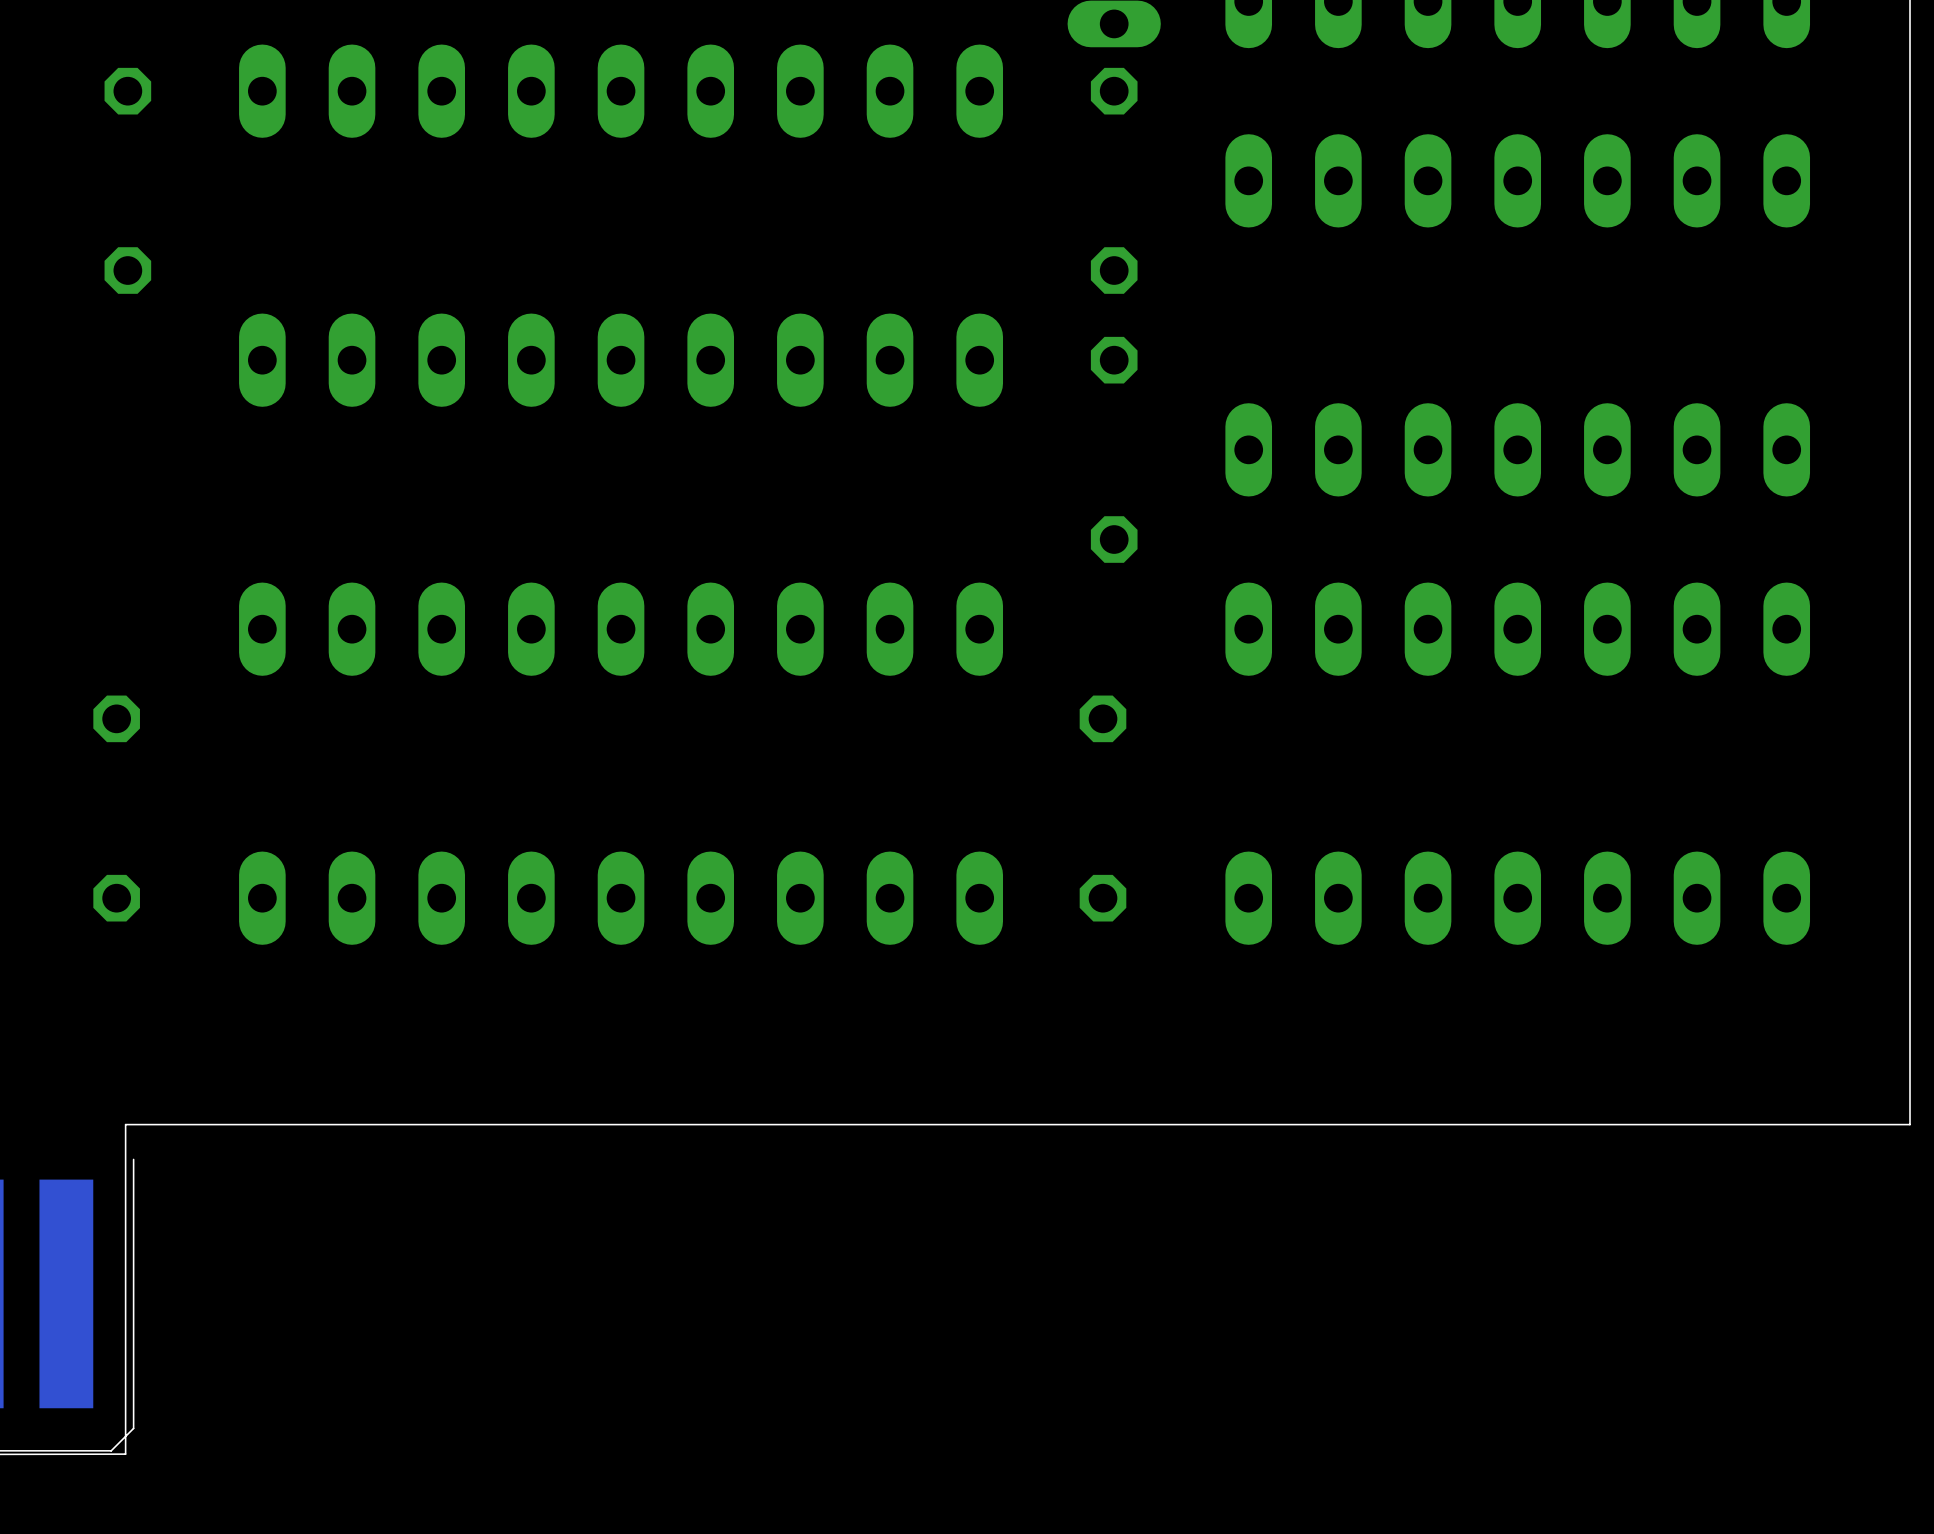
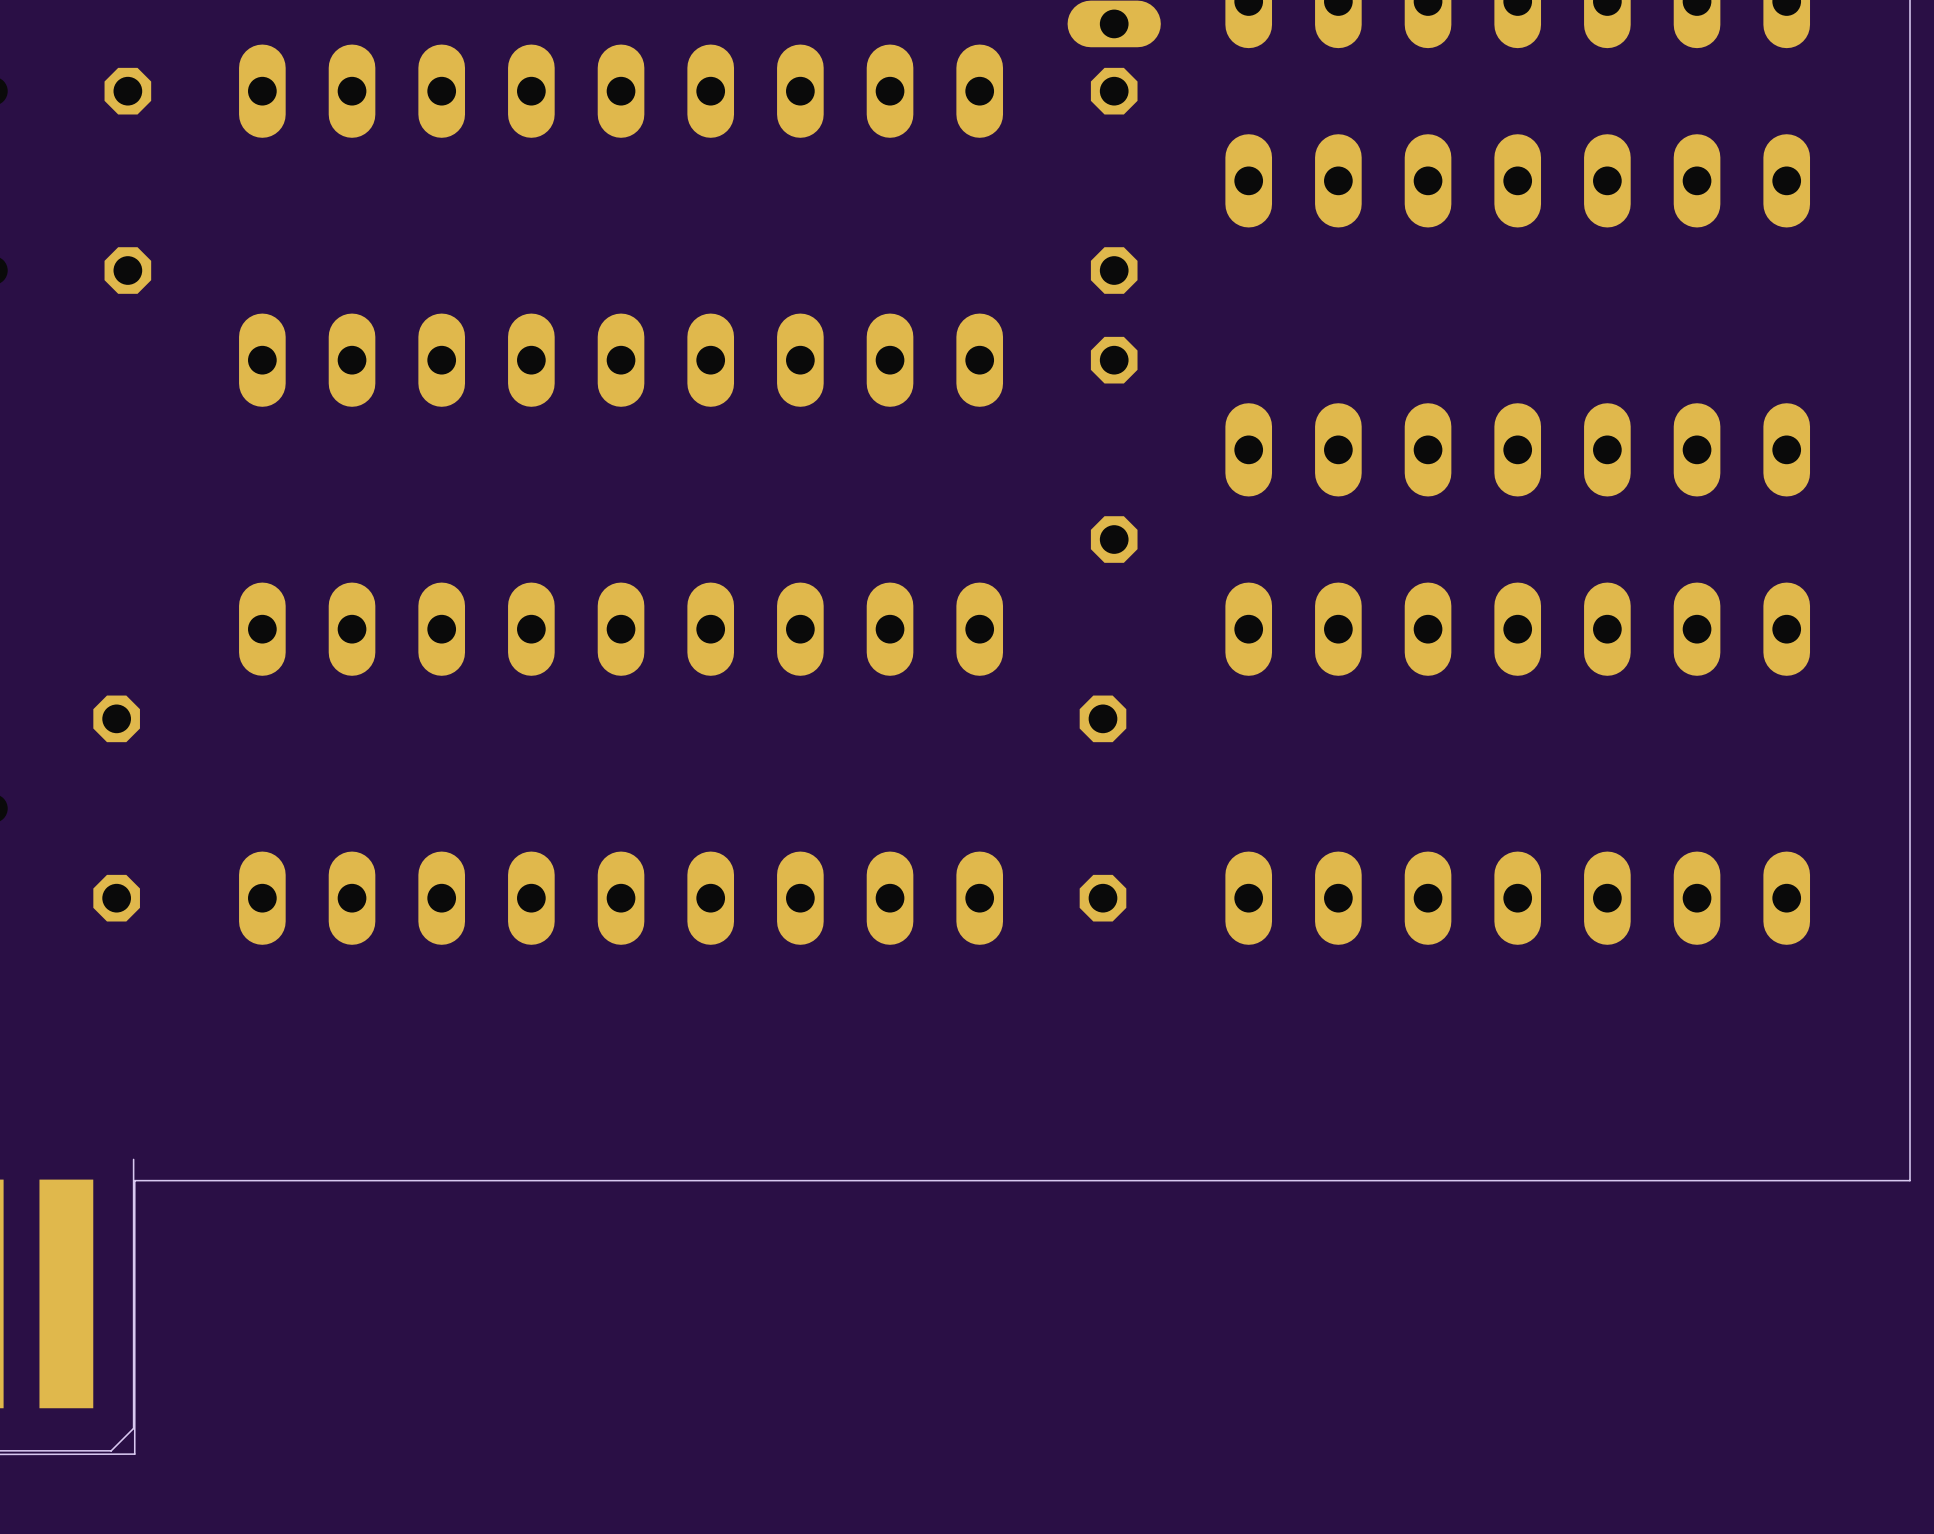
board edge: (1910, 1124) (125, 1124) (125, 1454) -> (1910, 1124) (1910, 1180) (134, 1180) (134, 1454) (125, 1454)

